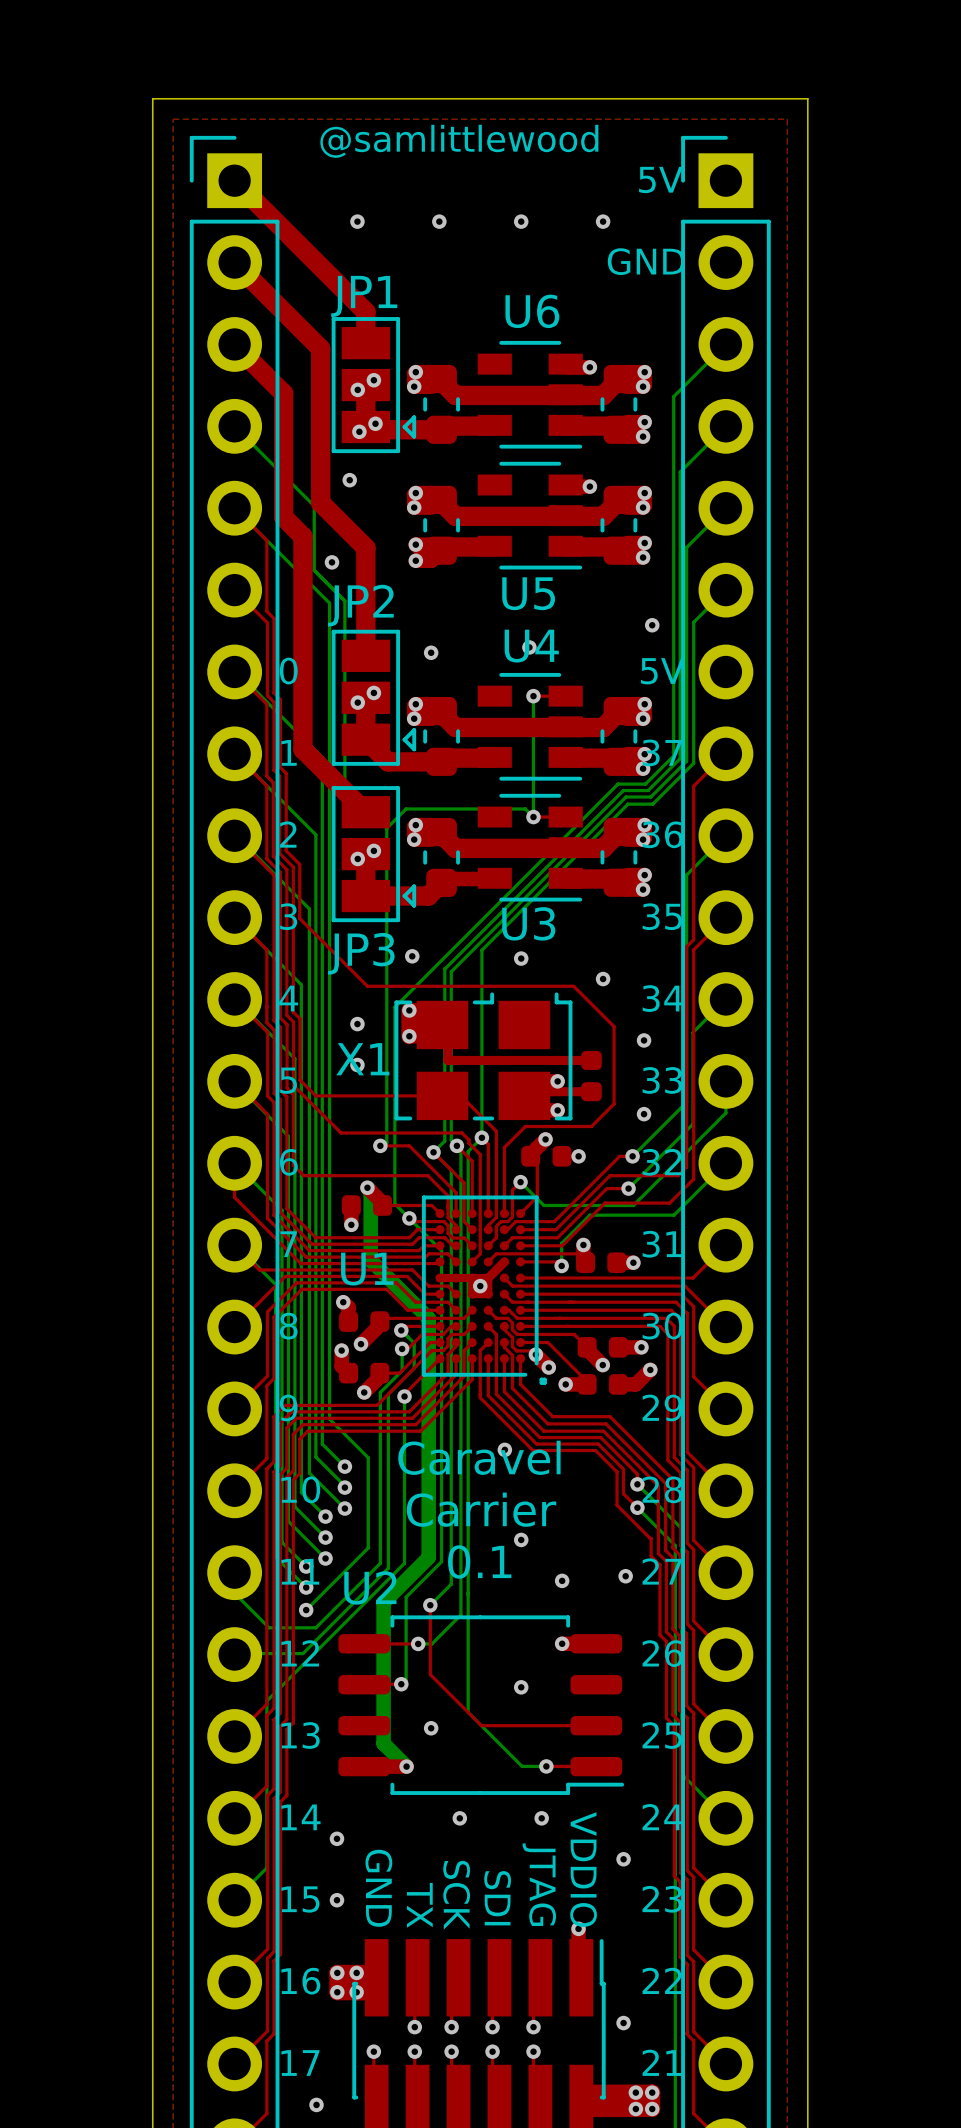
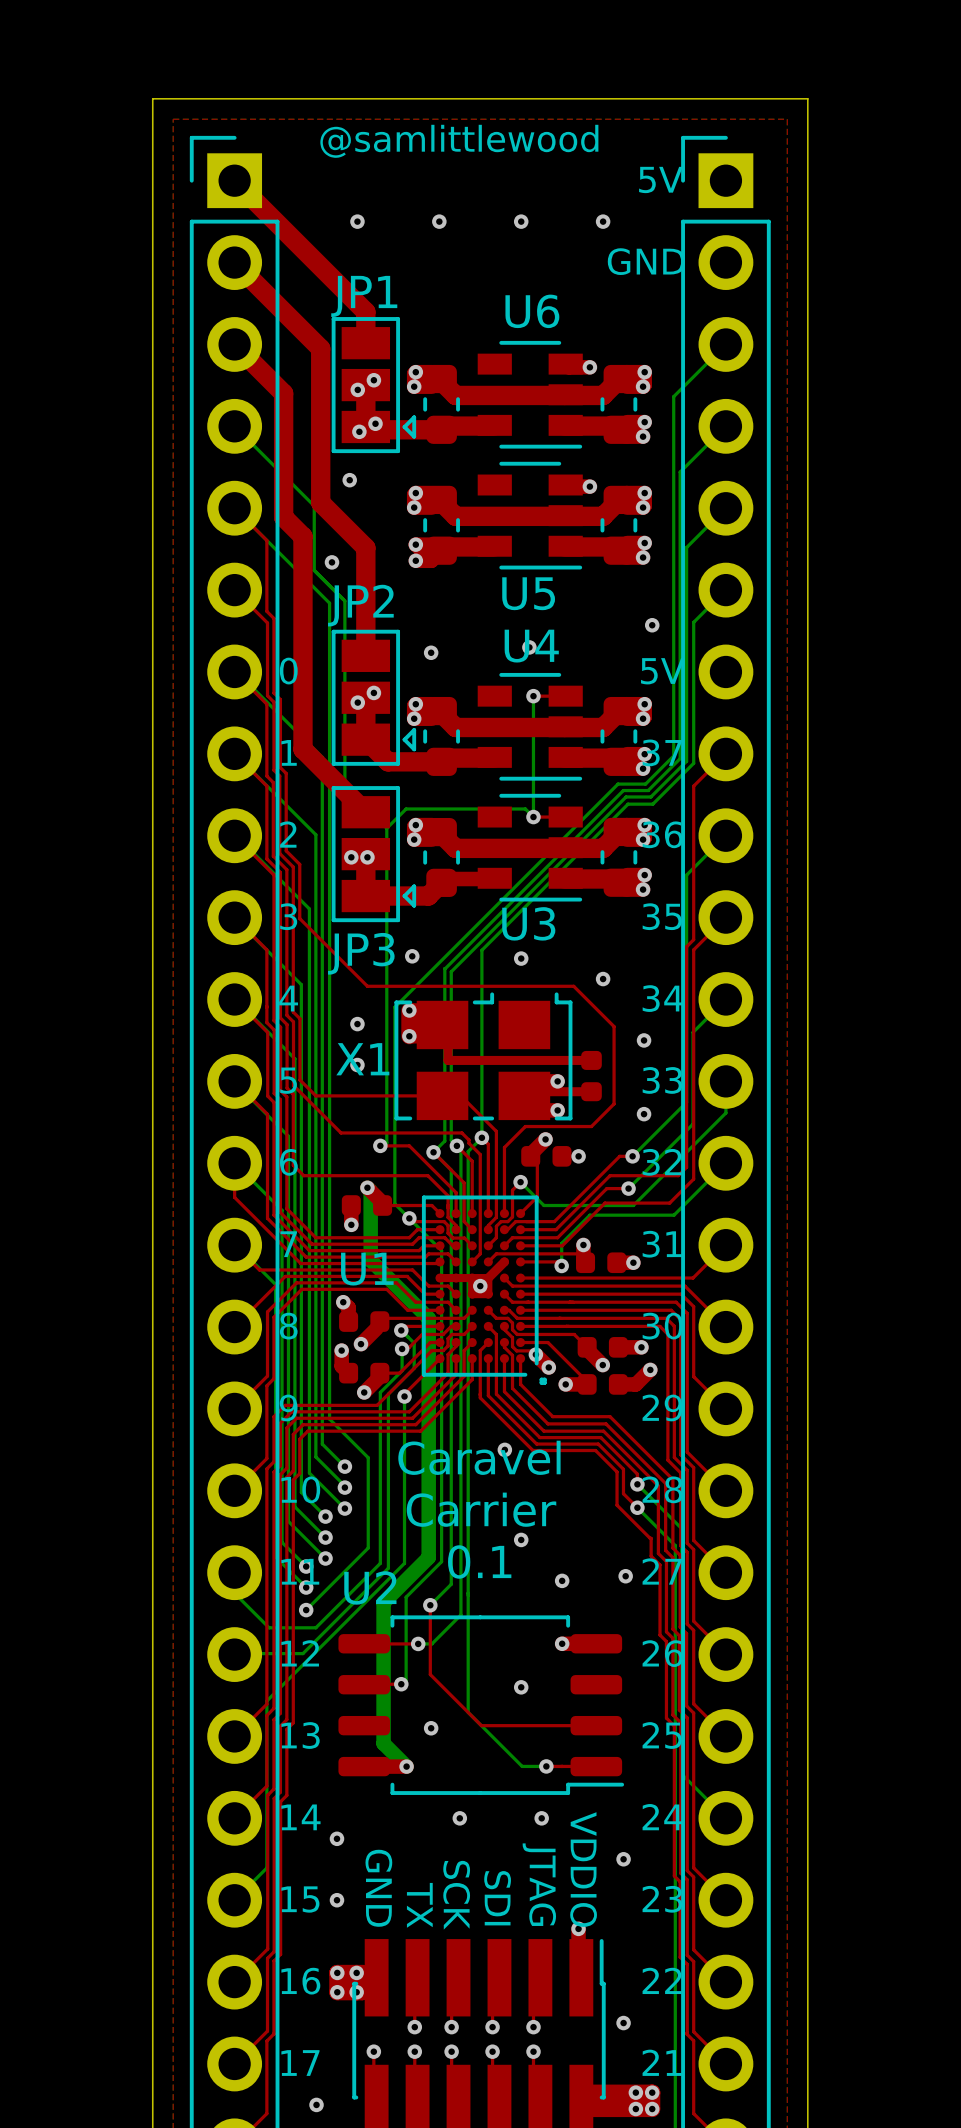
via: (373, 850) -> none
via: none -> (351, 857)
via: none -> (367, 857)
via: (357, 858) -> none

